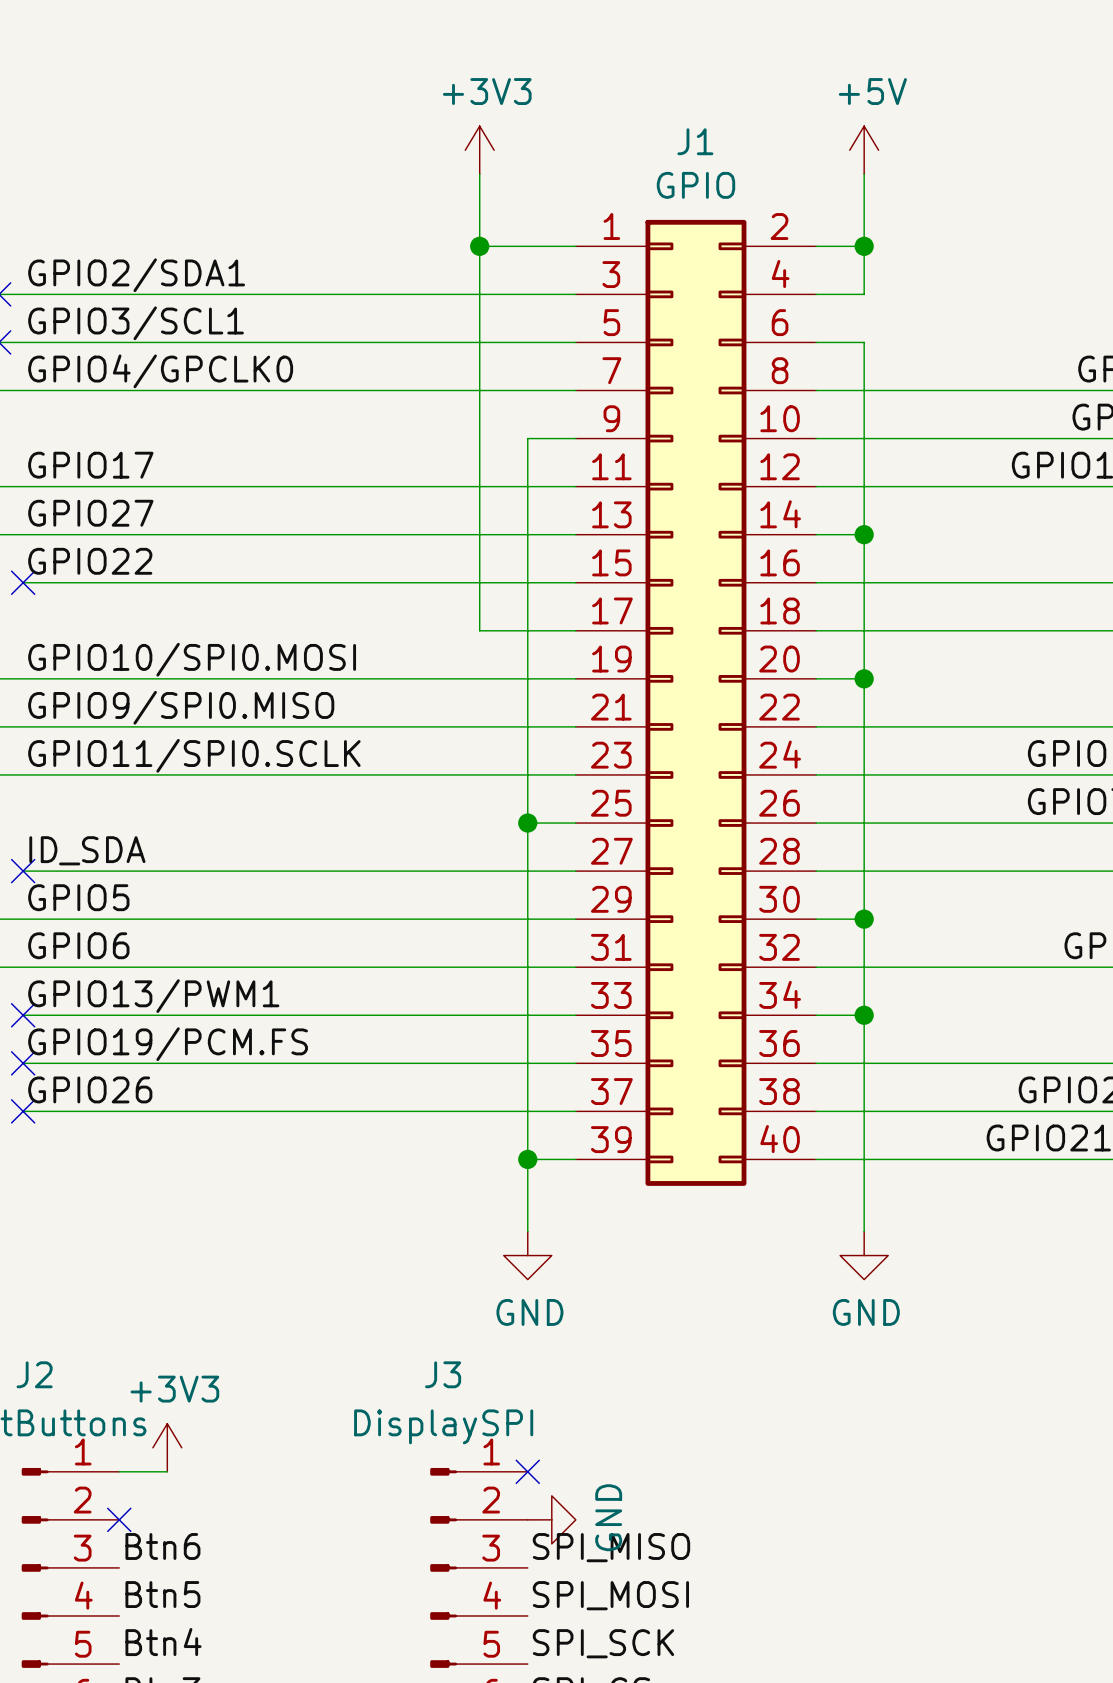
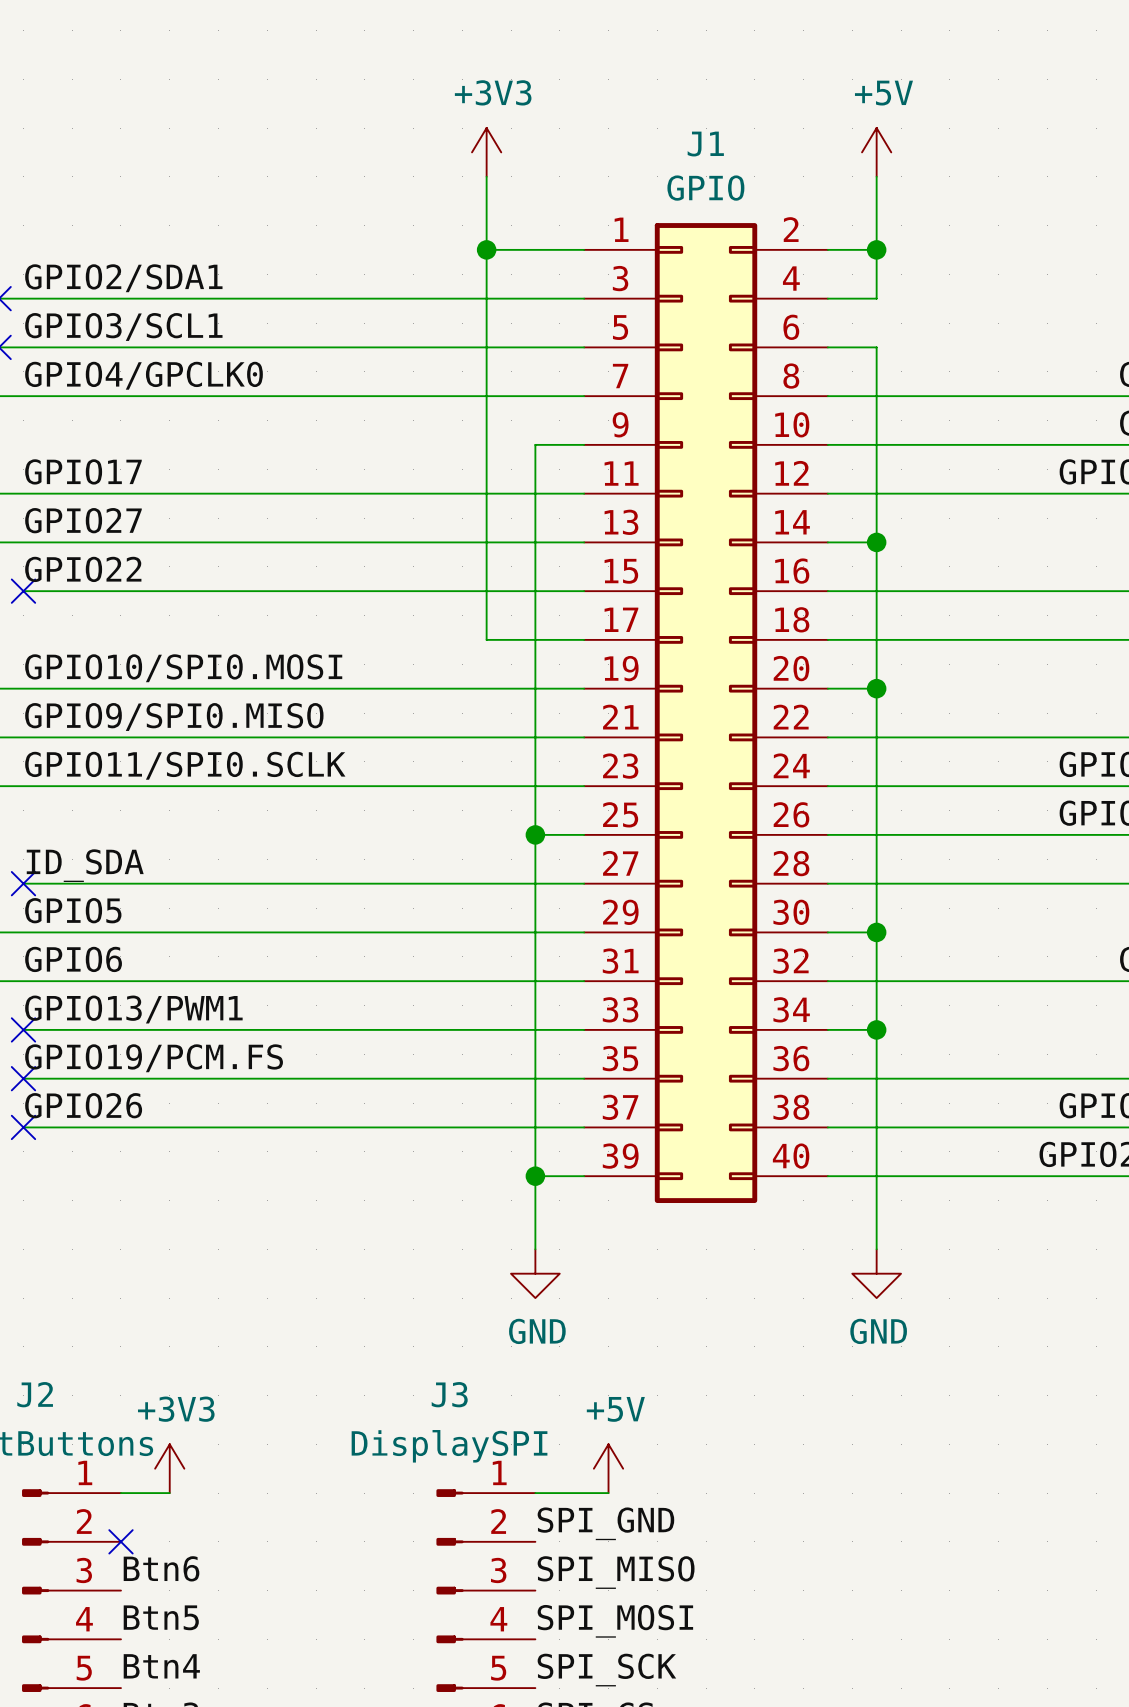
power symbol: none -> +5V (608, 1468)
wire: none -> (535, 1493) (608, 1493)
no-connect mark: (527, 1471) -> none
label: none -> SPI_GND (605, 1523)
power symbol: GND (551, 1519) -> none

